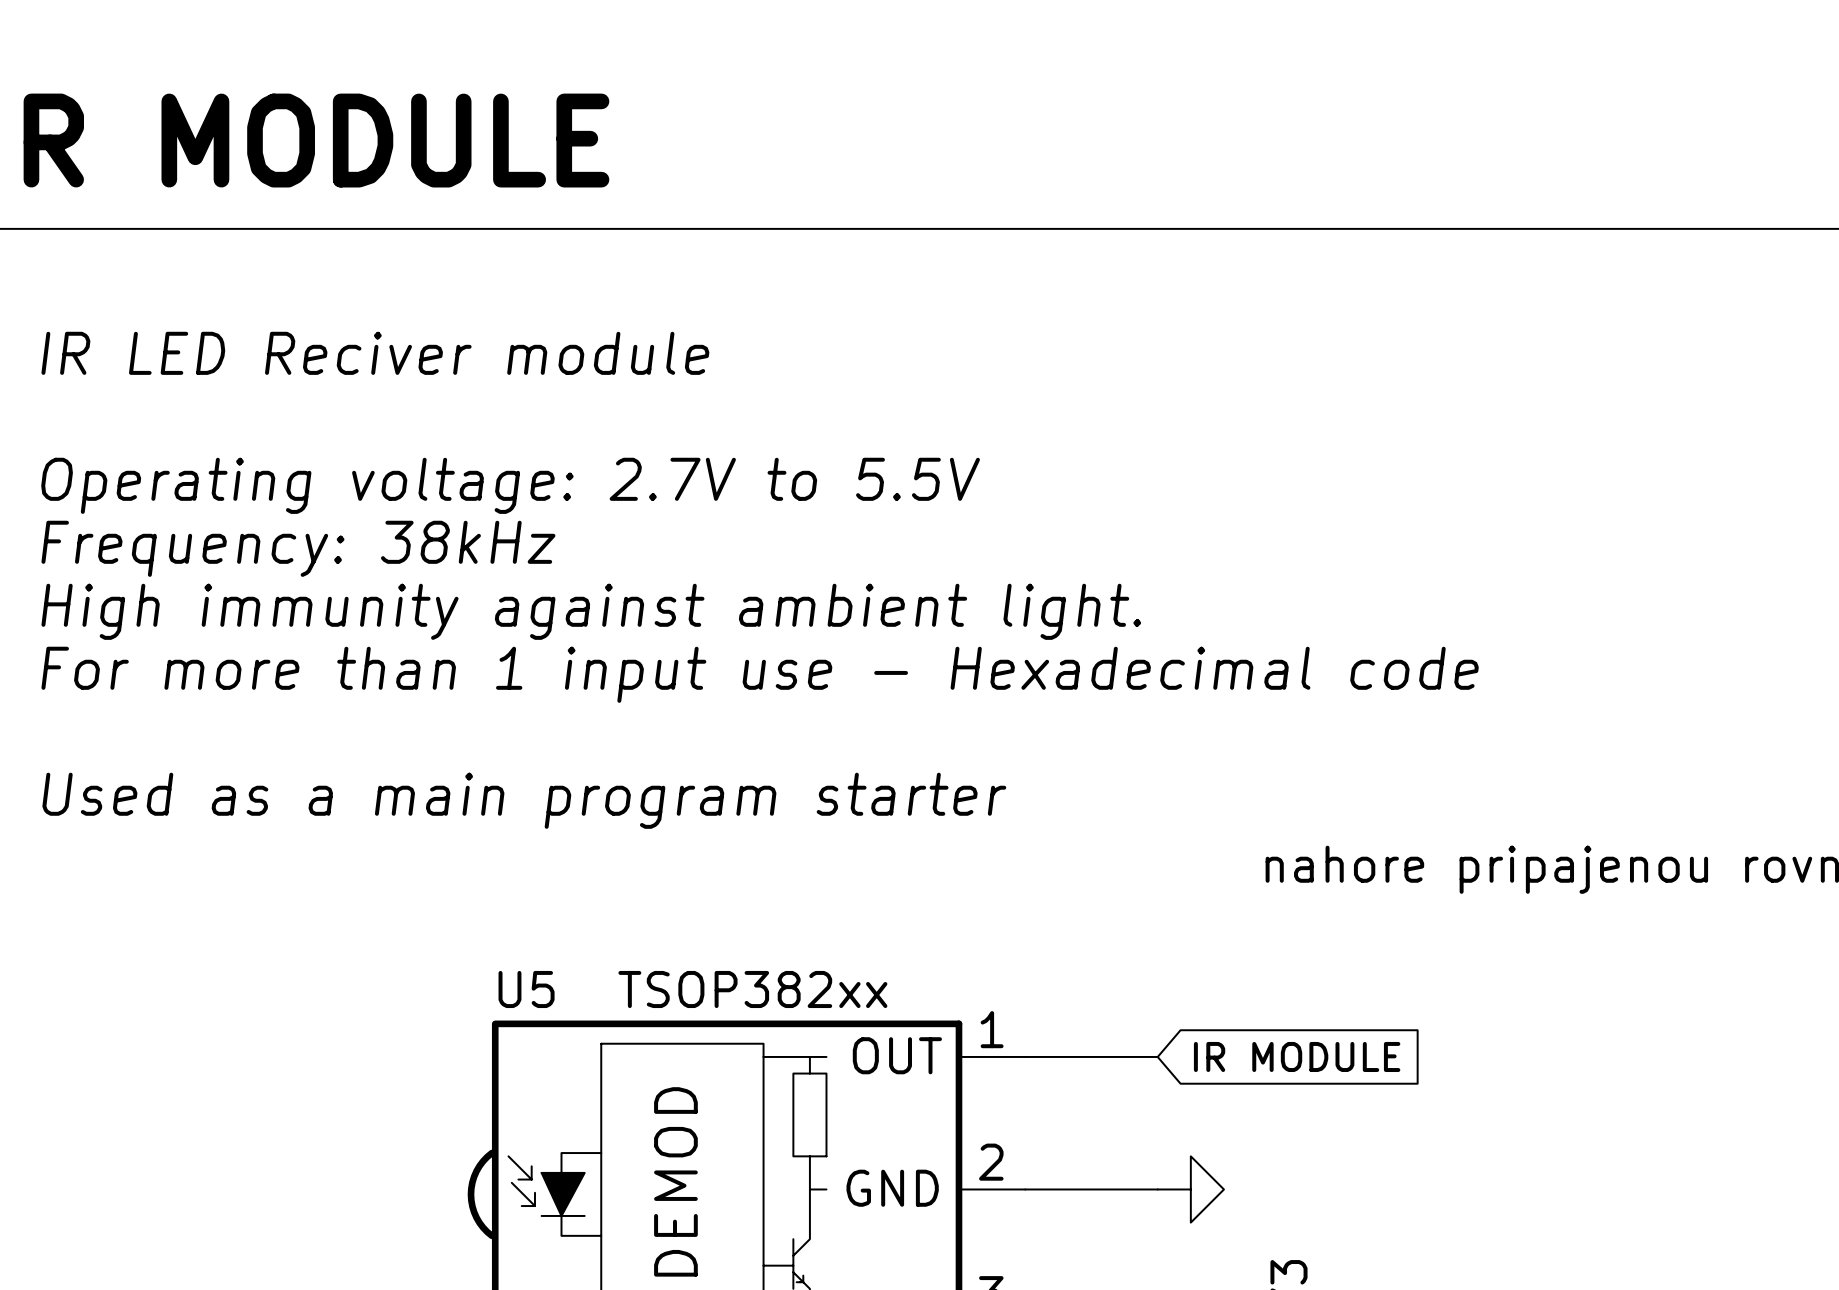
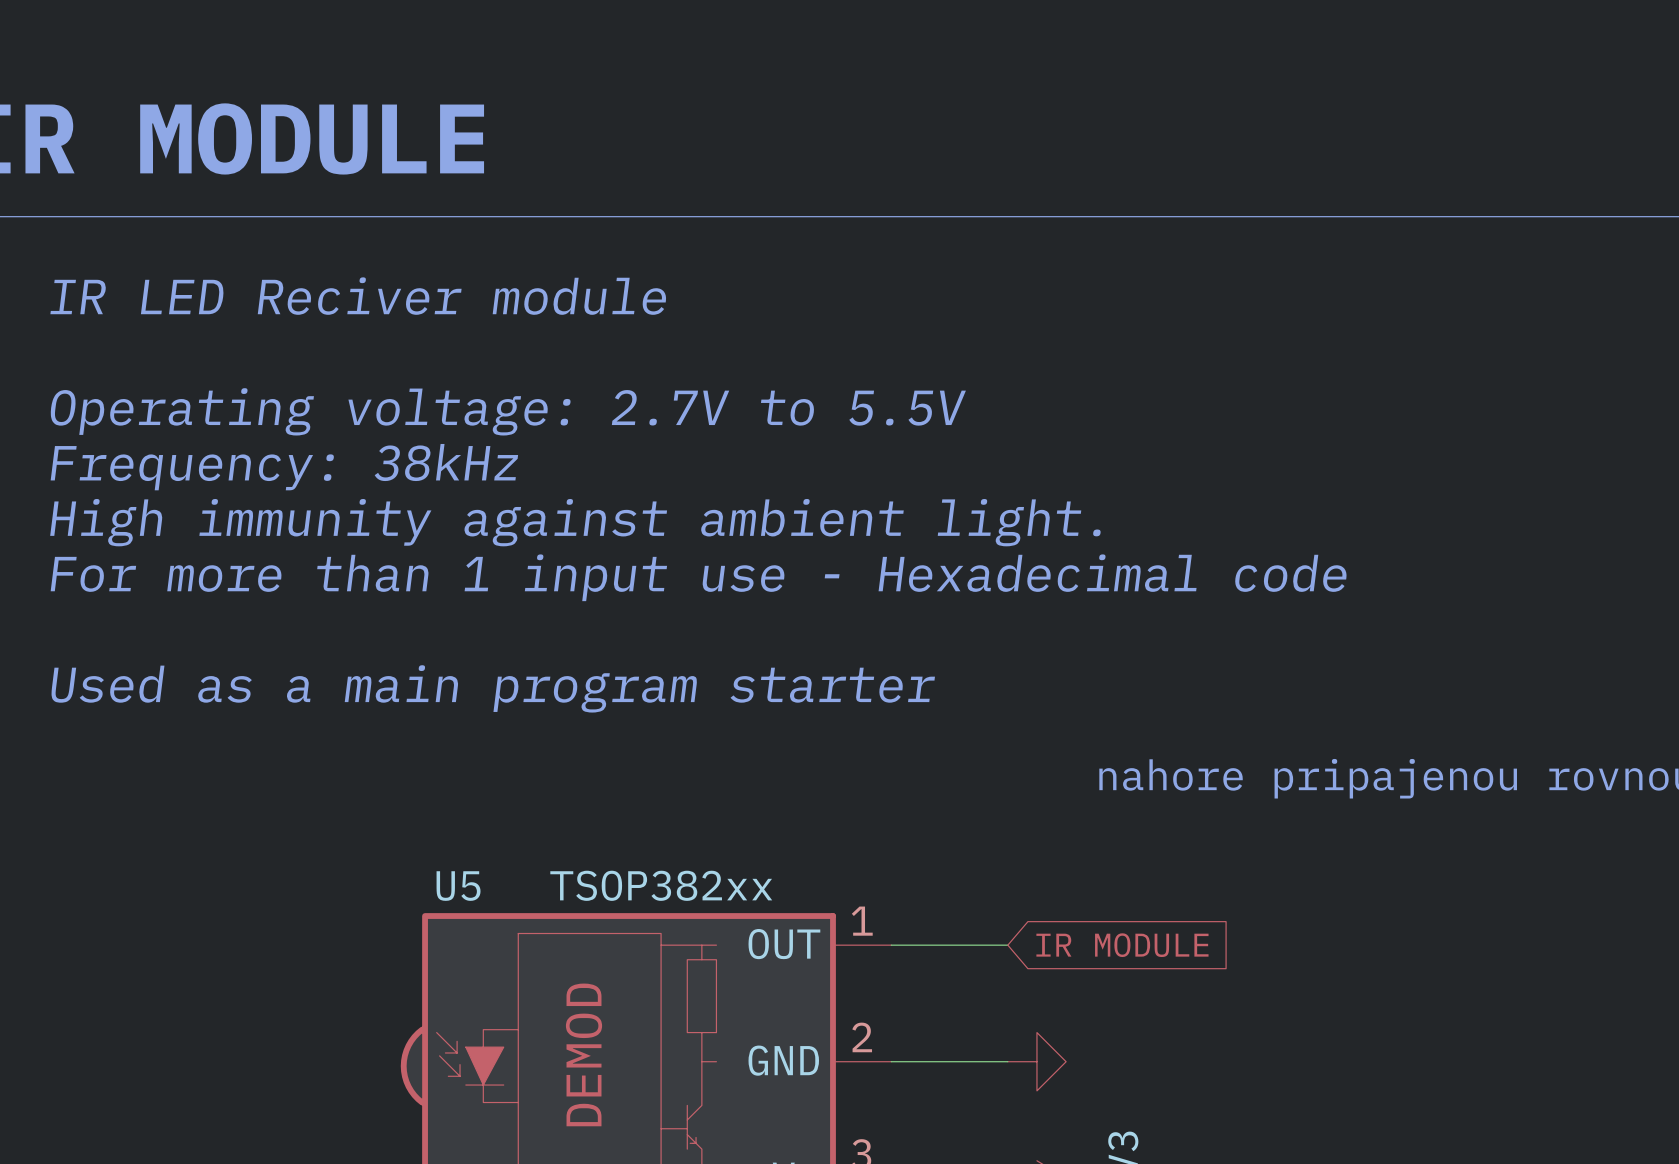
text position: IR LED Reciver module (375, 353) -> IR LED Reciver module (358, 296)
text position: Operating voltage: 2.7V to 5.5V (510, 485) -> Operating voltage: 2.7V to 5.5V (508, 411)
text position: Frequency: 38kHz (298, 548) -> Frequency: 38kHz (284, 467)
text position: High immunity against ambient light. (591, 611) -> High immunity against ambient light. (575, 522)
text position: For more than 1 input use - Hexadecimal code (760, 674) -> For more than 1 input use - Hexadecimal code (698, 577)
text position: Used as a main program starter (524, 800) -> Used as a main program starter (493, 688)

